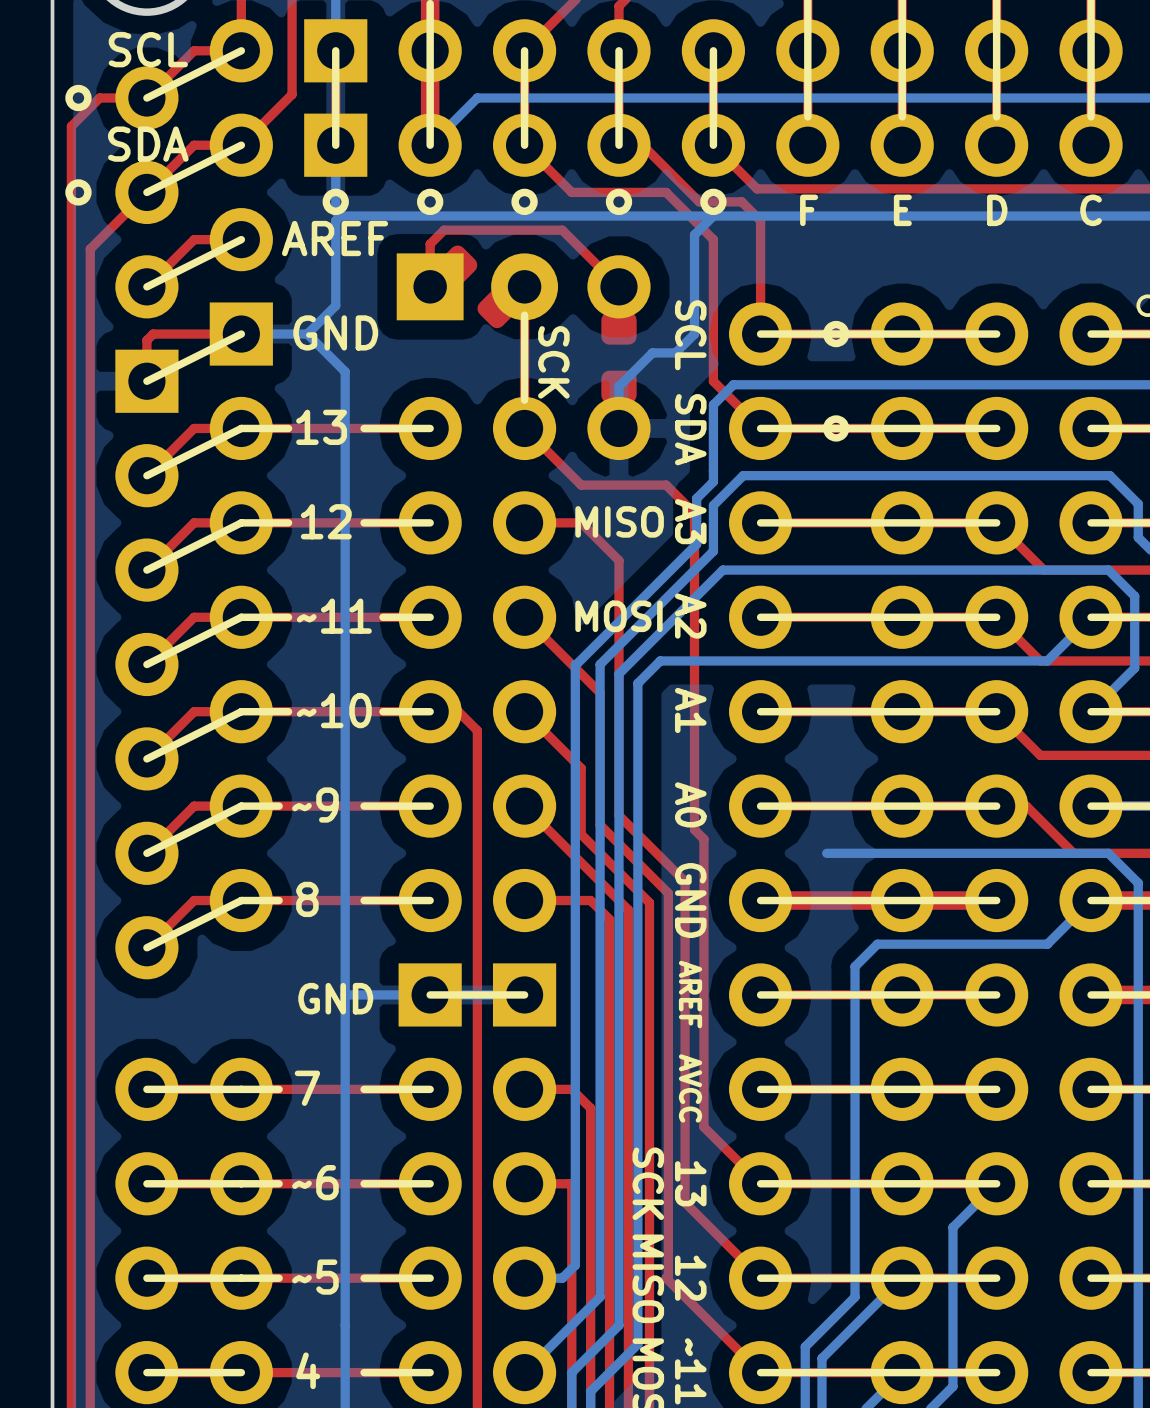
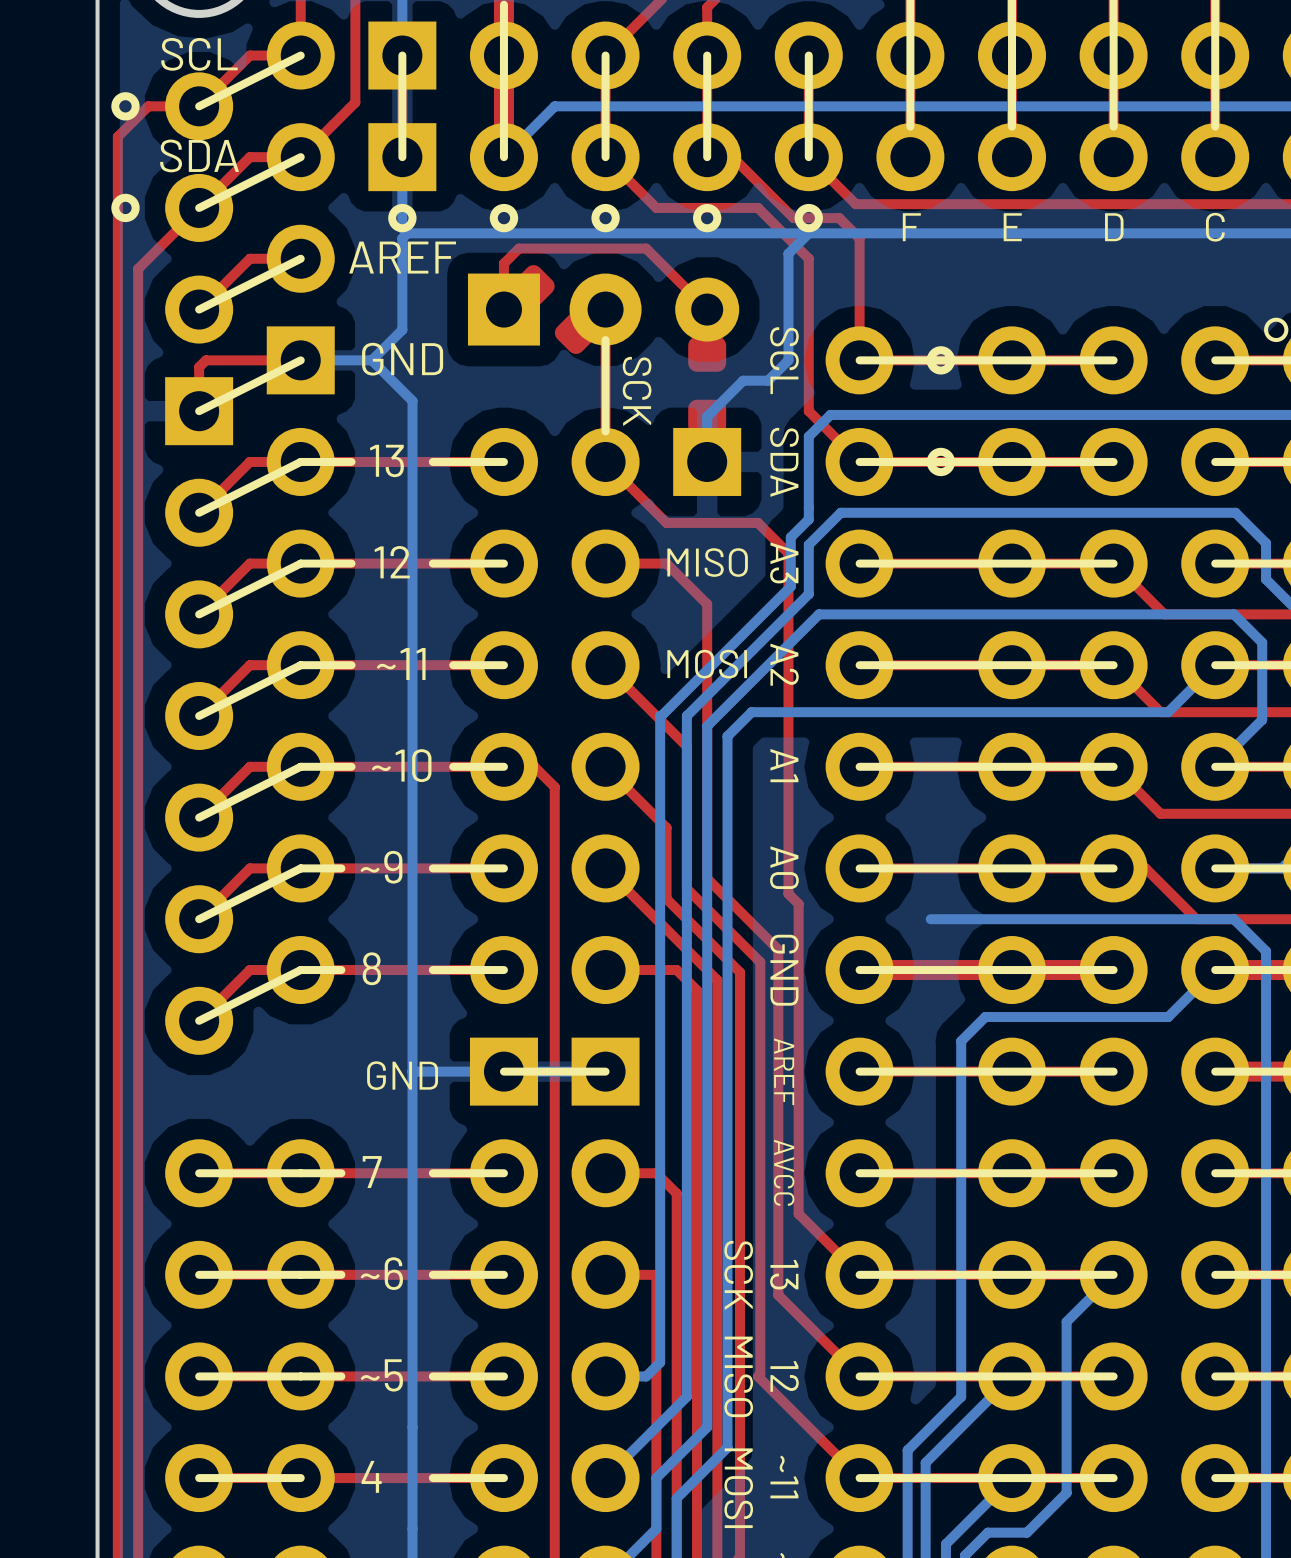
part footprint: [587, 255, 651, 461] -> [673, 277, 742, 496]

